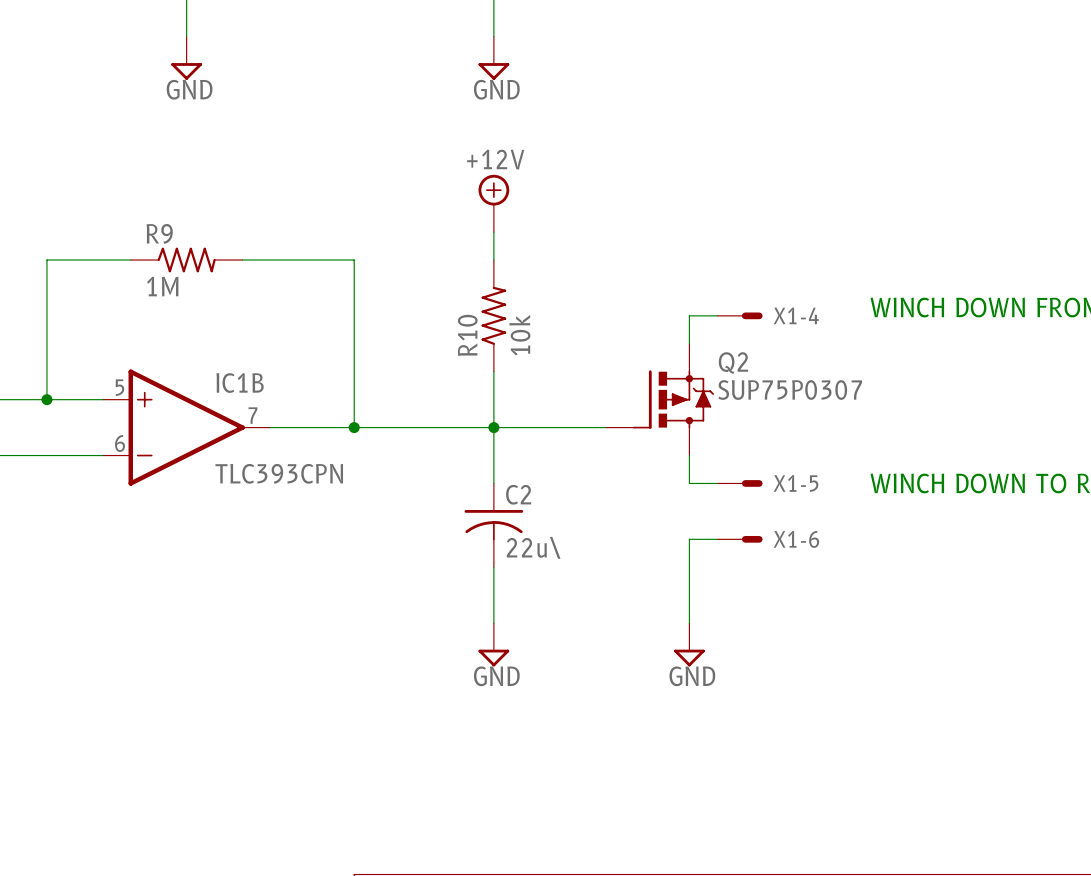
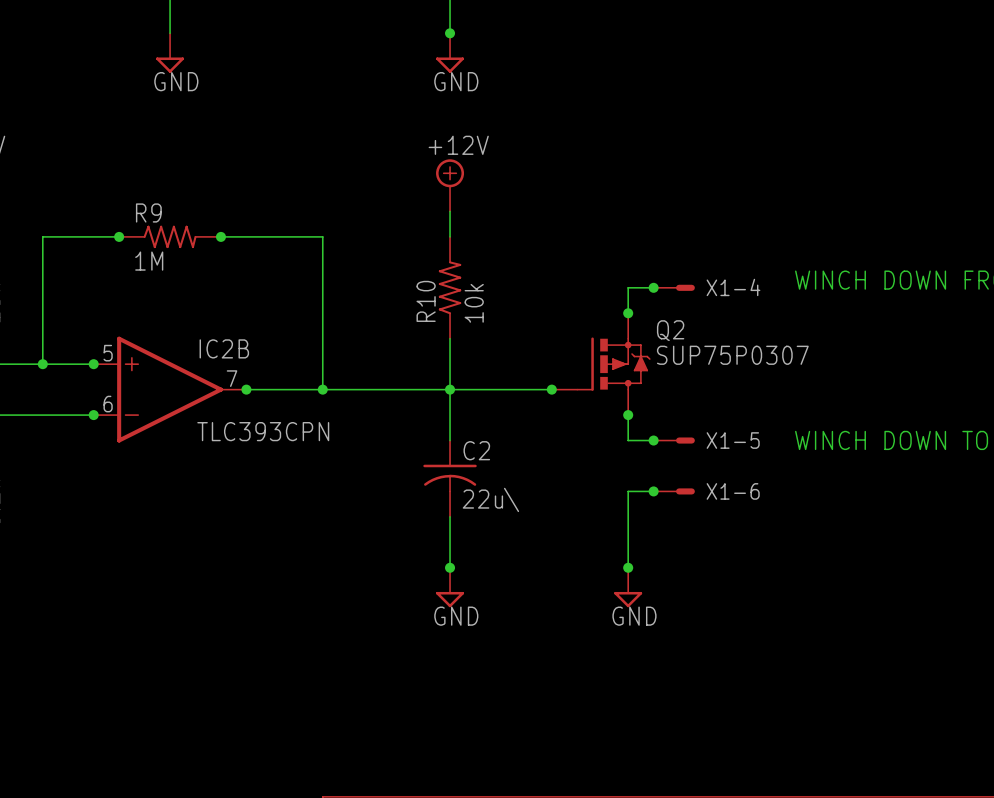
junction: none -> (450, 33)
junction: none -> (119, 236)
junction: none -> (220, 236)
junction: none -> (653, 287)
junction: none -> (628, 313)
IC1B name: IC1B (240, 383) -> IC2B (224, 348)
junction: none -> (93, 364)
junction: none -> (246, 389)
junction: none -> (551, 389)
junction: none -> (93, 415)
junction: none -> (628, 415)
junction: none -> (653, 440)
junction: none -> (653, 491)
junction: none -> (450, 567)
junction: none -> (628, 567)

